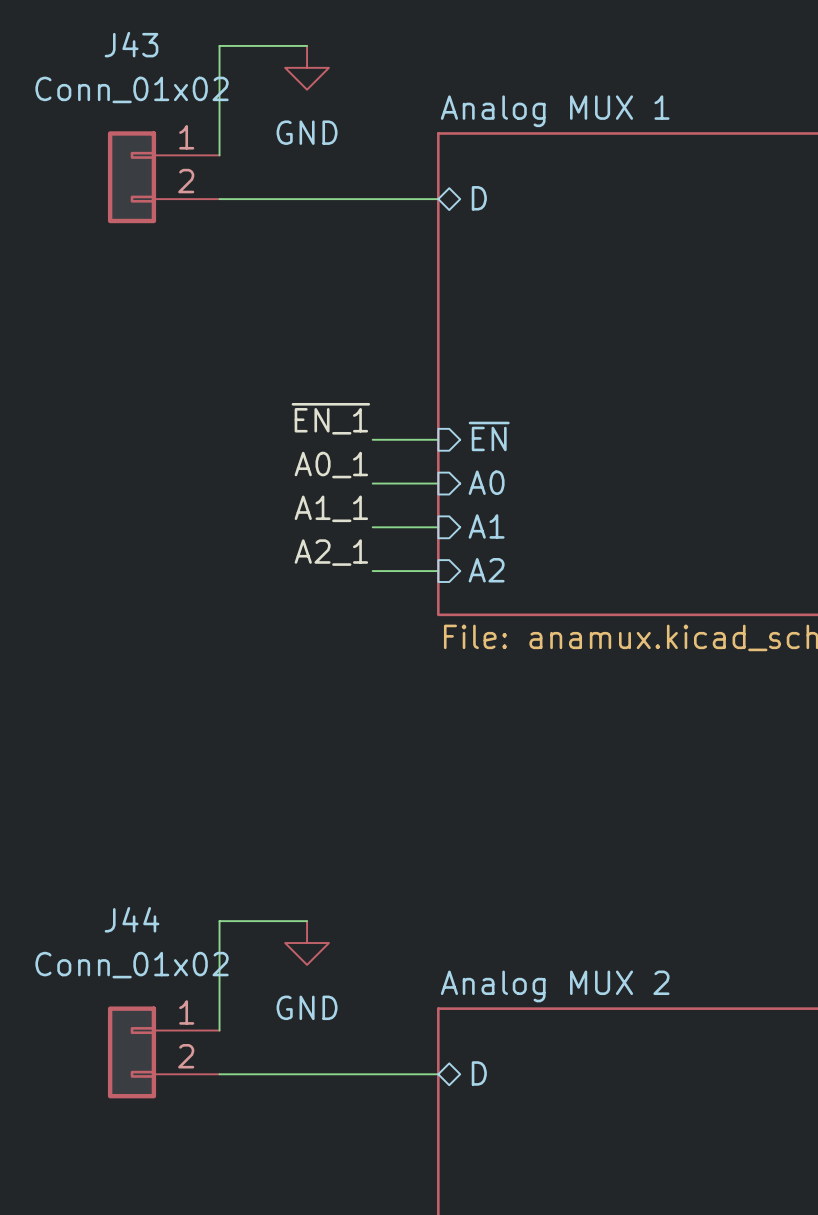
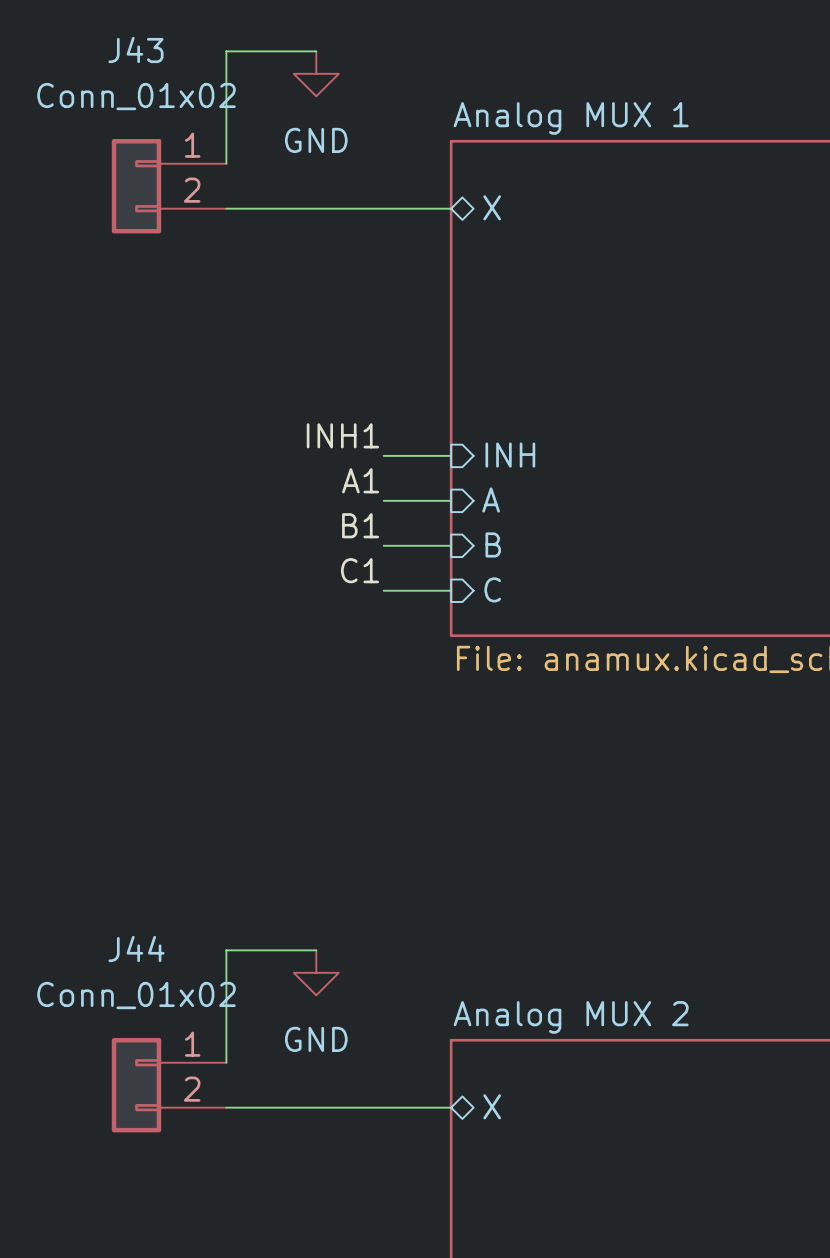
sheet pin: D (479, 198) -> X (492, 207)
label: ~{EN_1} (330, 418) -> INH1 (342, 435)
sheet pin: ~{EN} (489, 436) -> INH (510, 455)
label: A0_1 (331, 465) -> A1 (360, 480)
sheet pin: A0 (486, 482) -> A (491, 500)
label: A1_1 (331, 508) -> B1 (360, 525)
sheet pin: A1 (486, 526) -> B (493, 544)
label: A2_1 (331, 552) -> C1 (360, 570)
sheet pin: A2 (486, 570) -> C (492, 589)
sheet pin: D (479, 1073) -> X (492, 1106)

